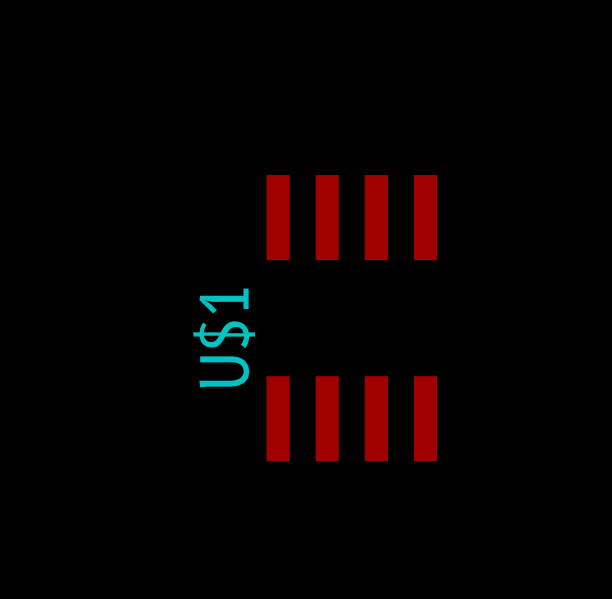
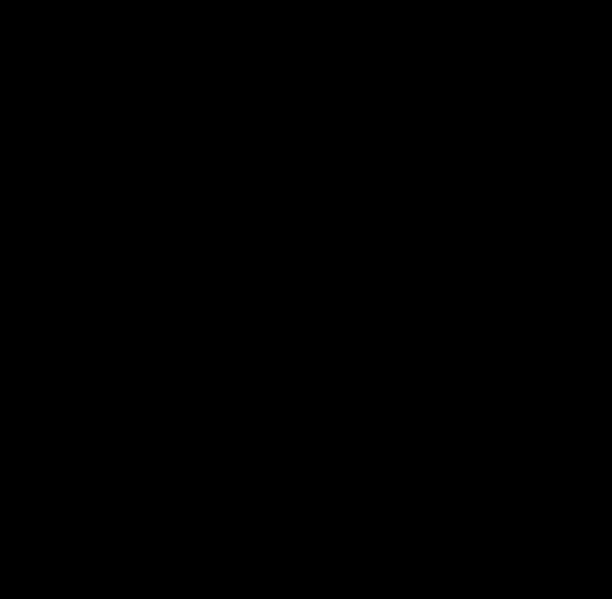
U$1: (351, 318) -> none

